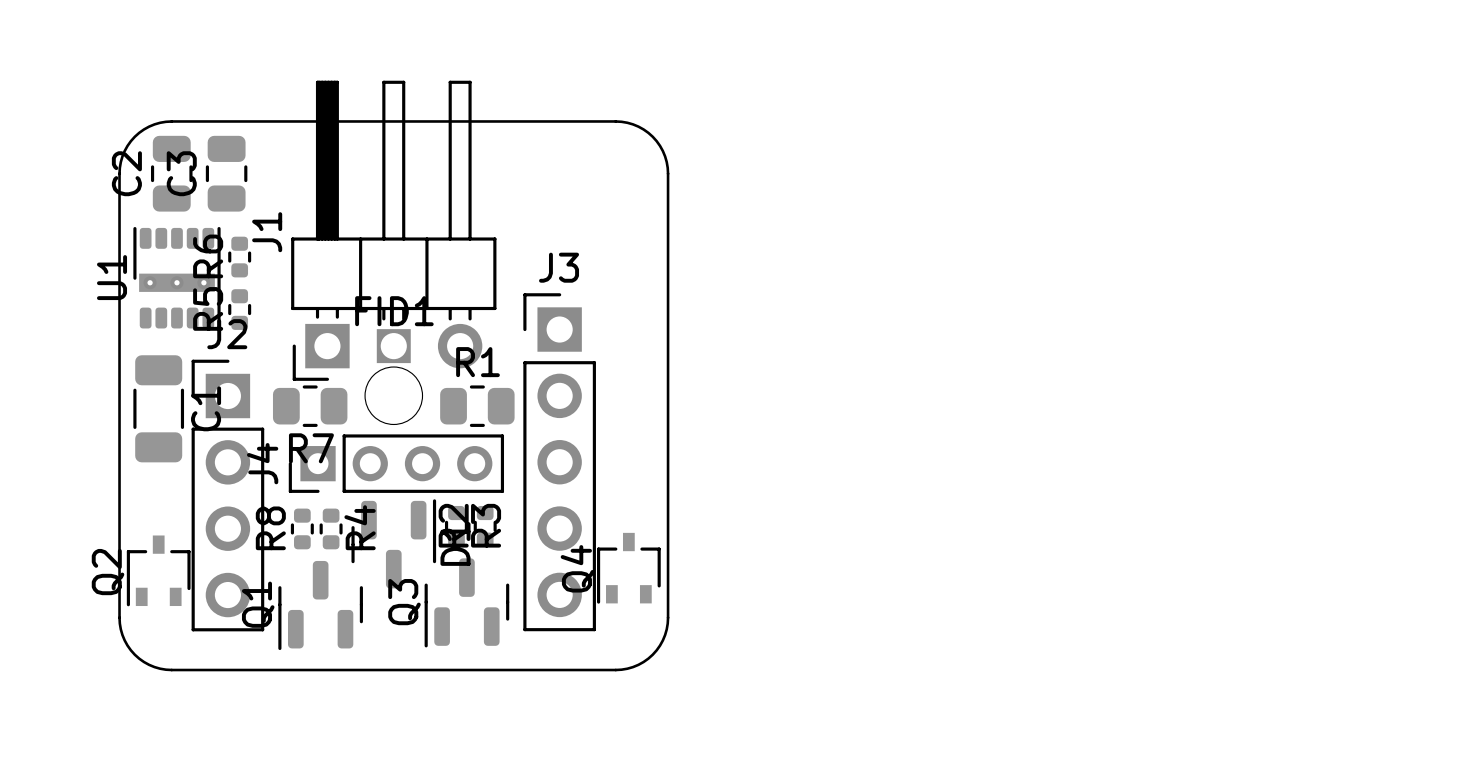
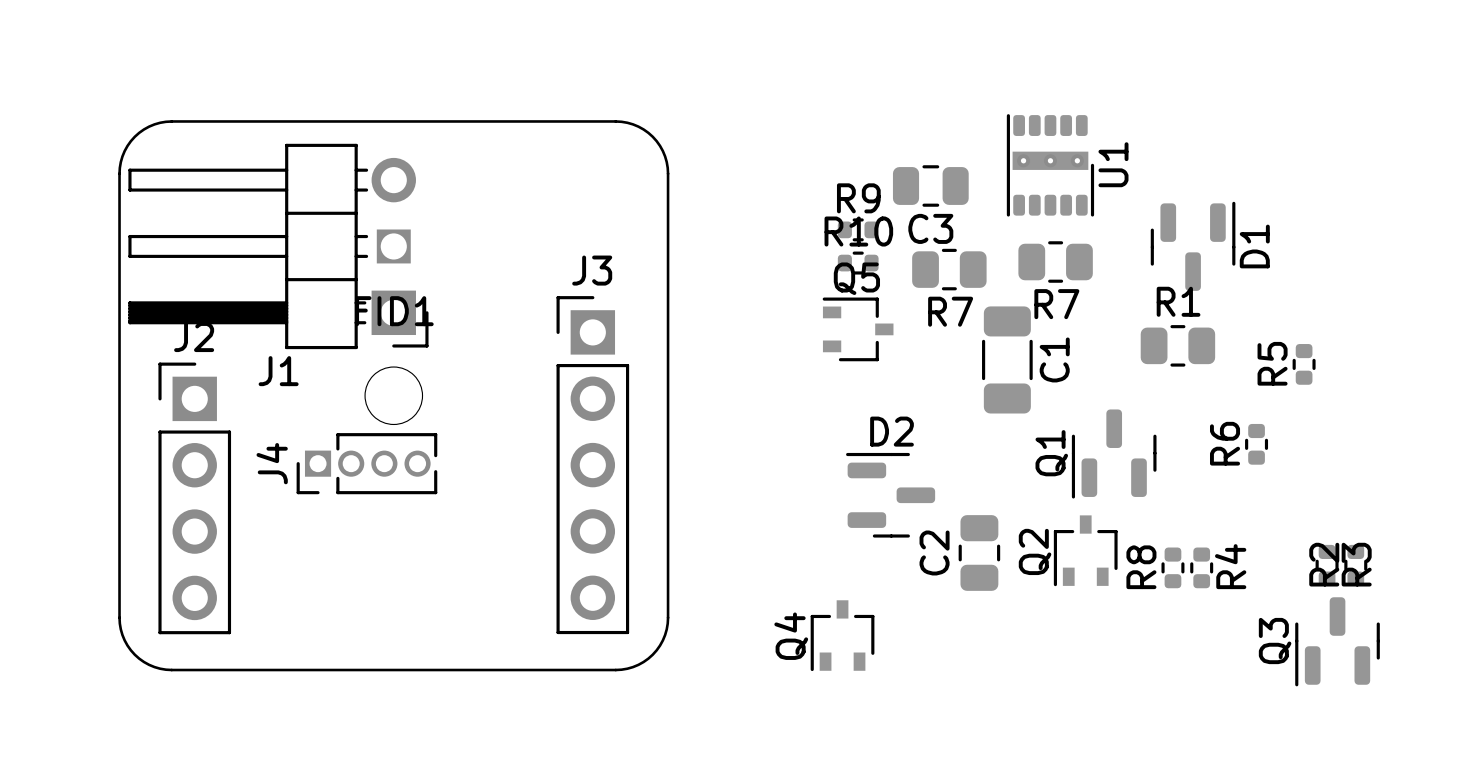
C2 position: (171, 173) -> (979, 552)
C3 name position: C3 (181, 173) -> C3 (930, 228)
C3 rotation: 0° (226, 173) -> 90° clockwise (930, 185)
C3 position: (226, 173) -> (930, 185)
R9: none -> (858, 229)
J1 rotation: 0° (393, 230) -> 90° counterclockwise (278, 246)
R6 position: (239, 257) -> (1256, 444)
R7: none -> (1055, 262)
R10: none -> (858, 263)
R7: none -> (949, 269)
U1 rotation: 0° (176, 278) -> 180° (1050, 165)
U1 position: (176, 278) -> (1050, 165)
R5 position: (239, 309) -> (1304, 364)
Q5: none -> (858, 329)
R7: (310, 406) -> none
R1 position: (477, 406) -> (1177, 345)
C1 position: (158, 408) -> (1007, 359)
J4 footprint: [288, 434, 505, 493] -> [296, 433, 438, 495]
J3 position: (559, 462) -> (592, 465)
J2 position: (227, 495) -> (194, 498)
D2: none -> (890, 495)
R3 position: (456, 526) -> (1327, 565)
R2 position: (485, 526) -> (1355, 565)
R8 position: (302, 528) -> (1172, 567)
R4 position: (331, 528) -> (1201, 567)
D1 position: (393, 543) -> (1193, 246)
Q4 position: (628, 568) -> (842, 635)
Q2 position: (158, 570) -> (1085, 550)
Q3 position: (466, 602) -> (1337, 641)
Q1 position: (320, 605) -> (1114, 453)

